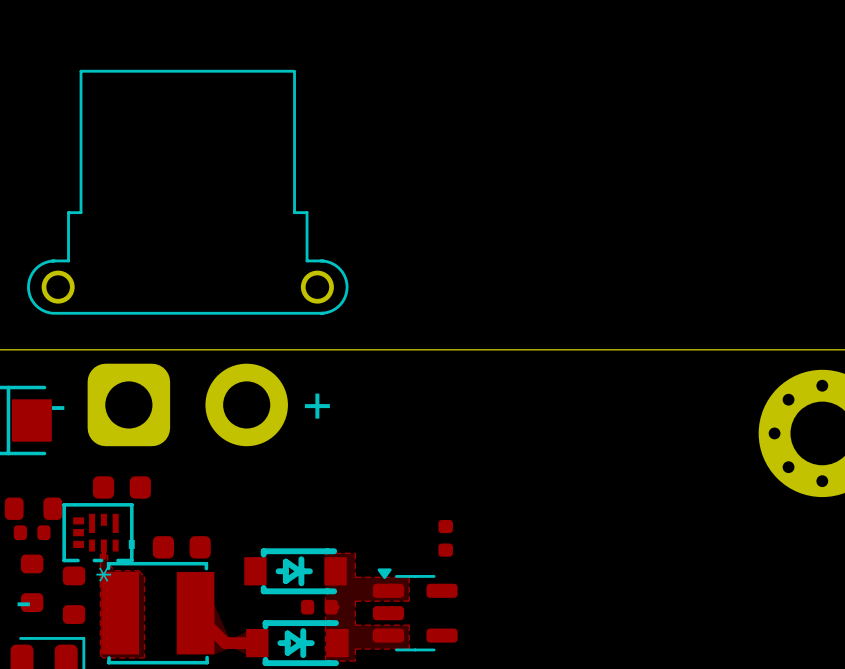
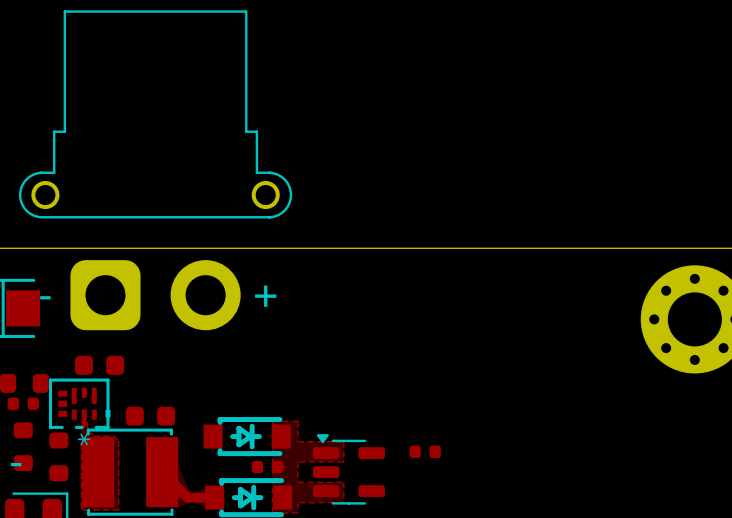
part rotation: 0° (445, 538) -> 90° clockwise (425, 451)
part position: (445, 538) -> (425, 451)

